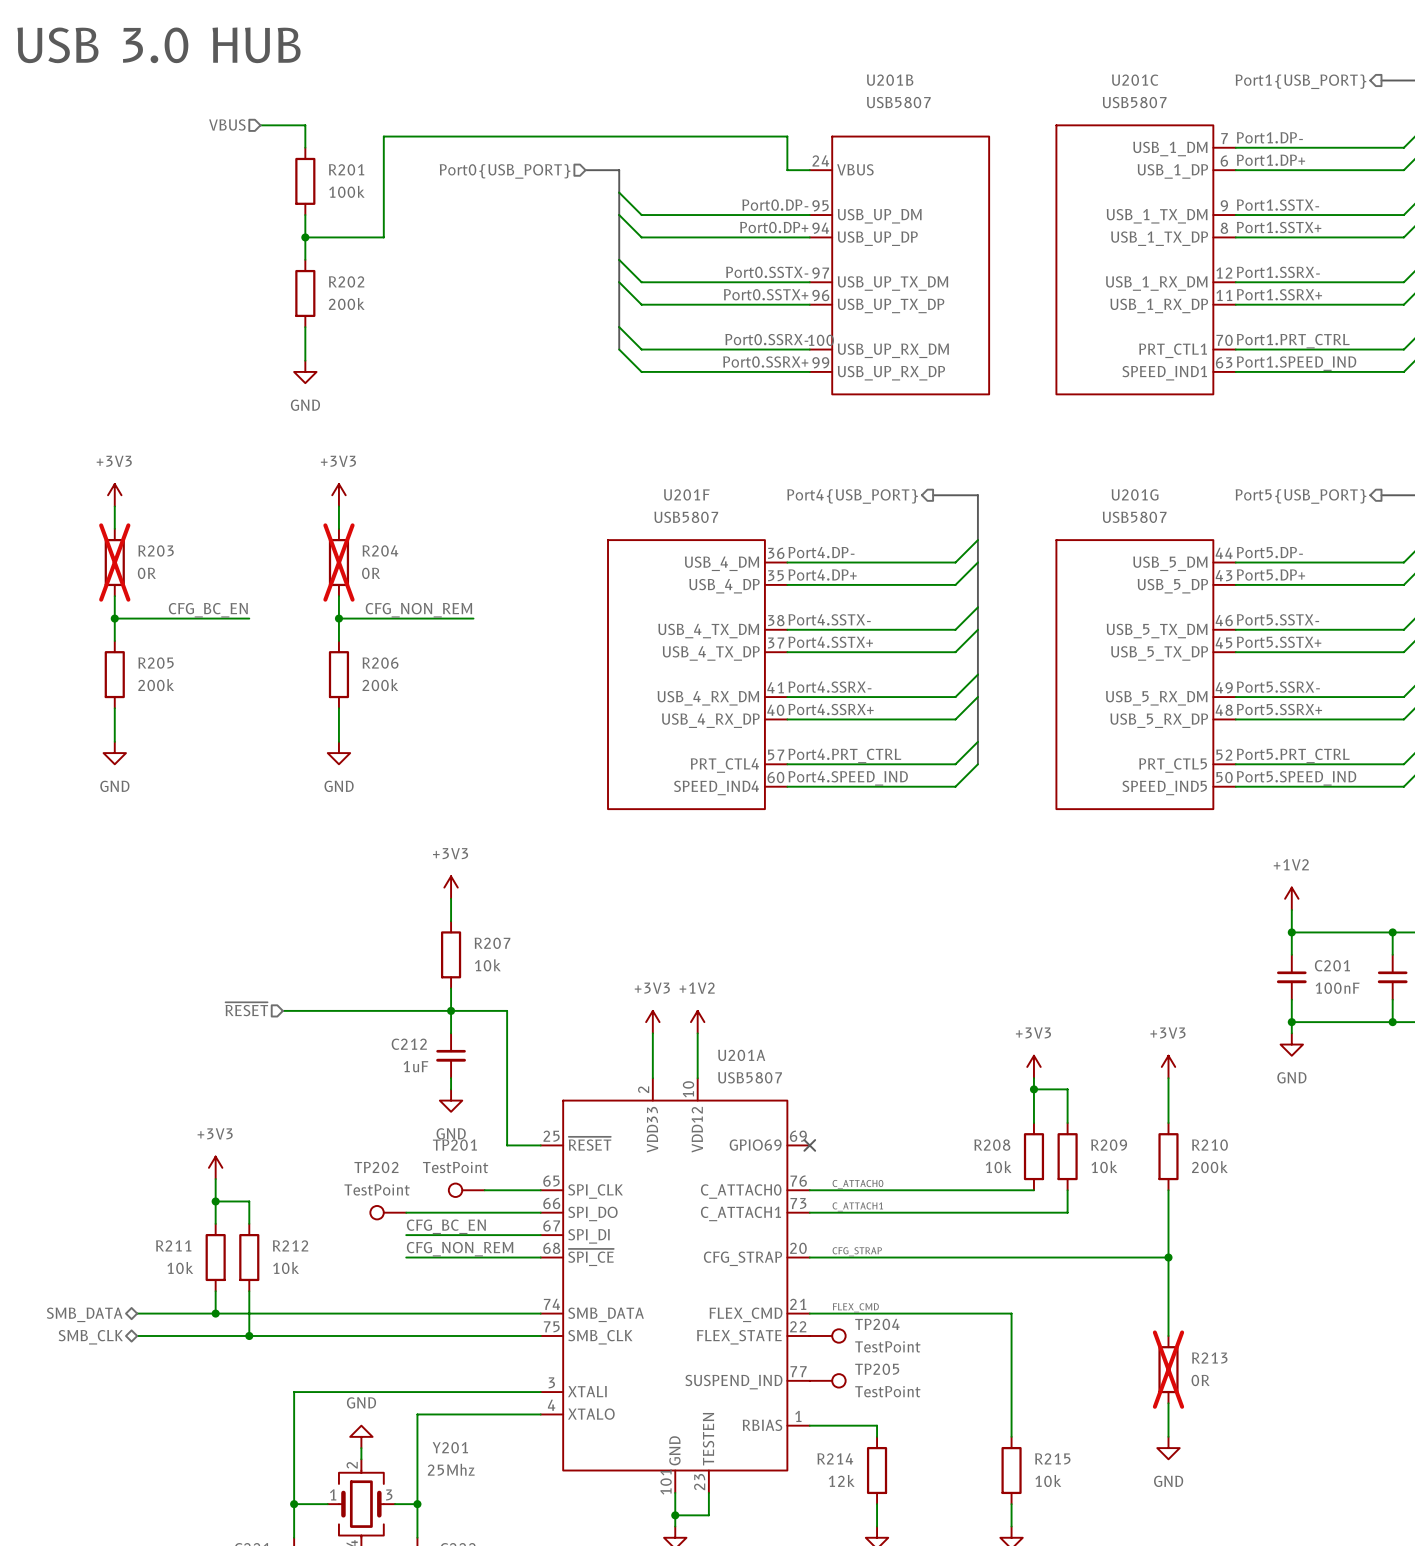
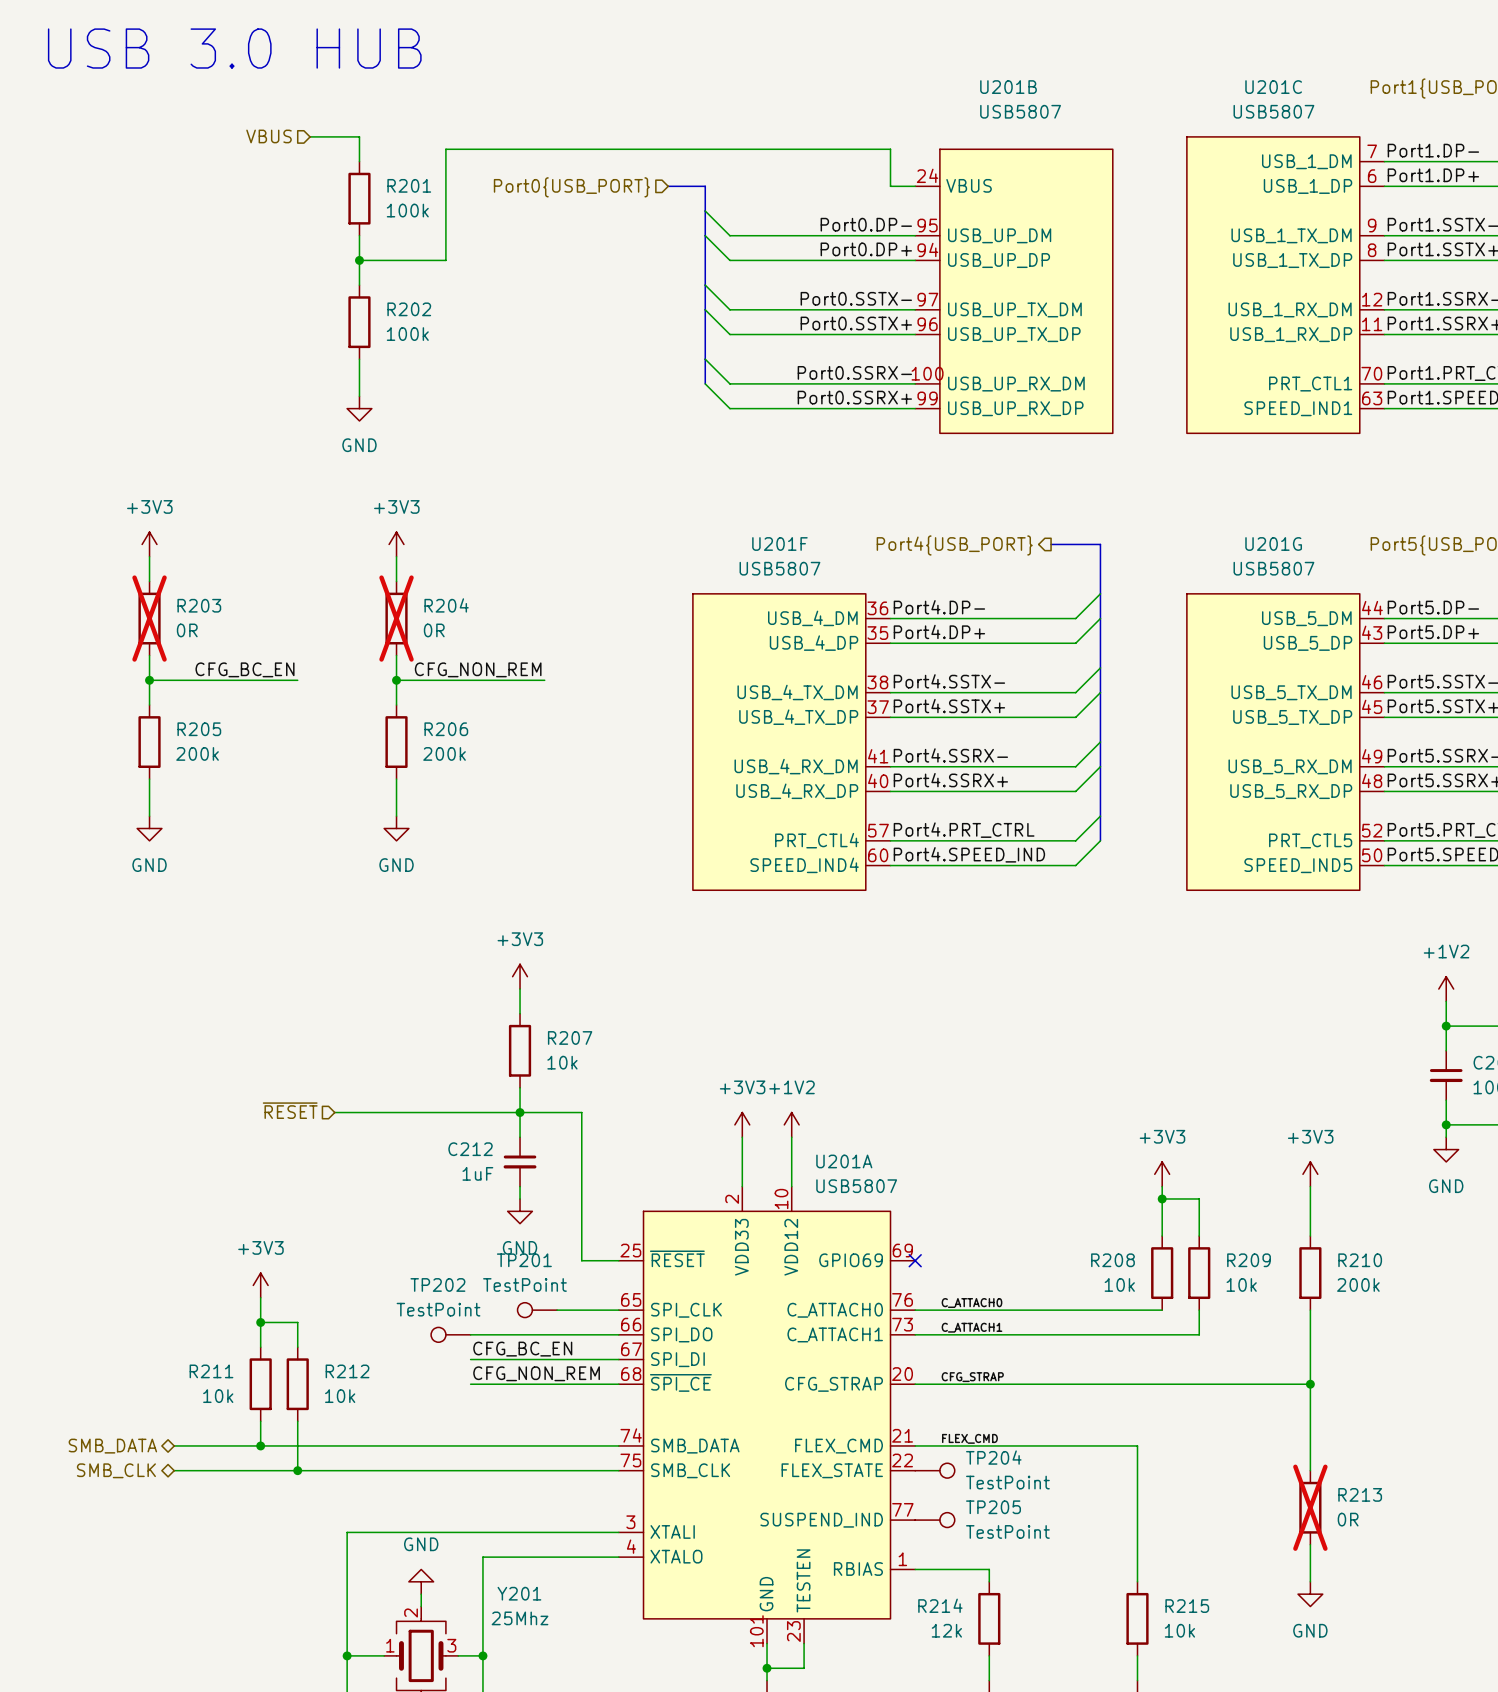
R202 value: 200k (346, 303) -> 100k (407, 334)

